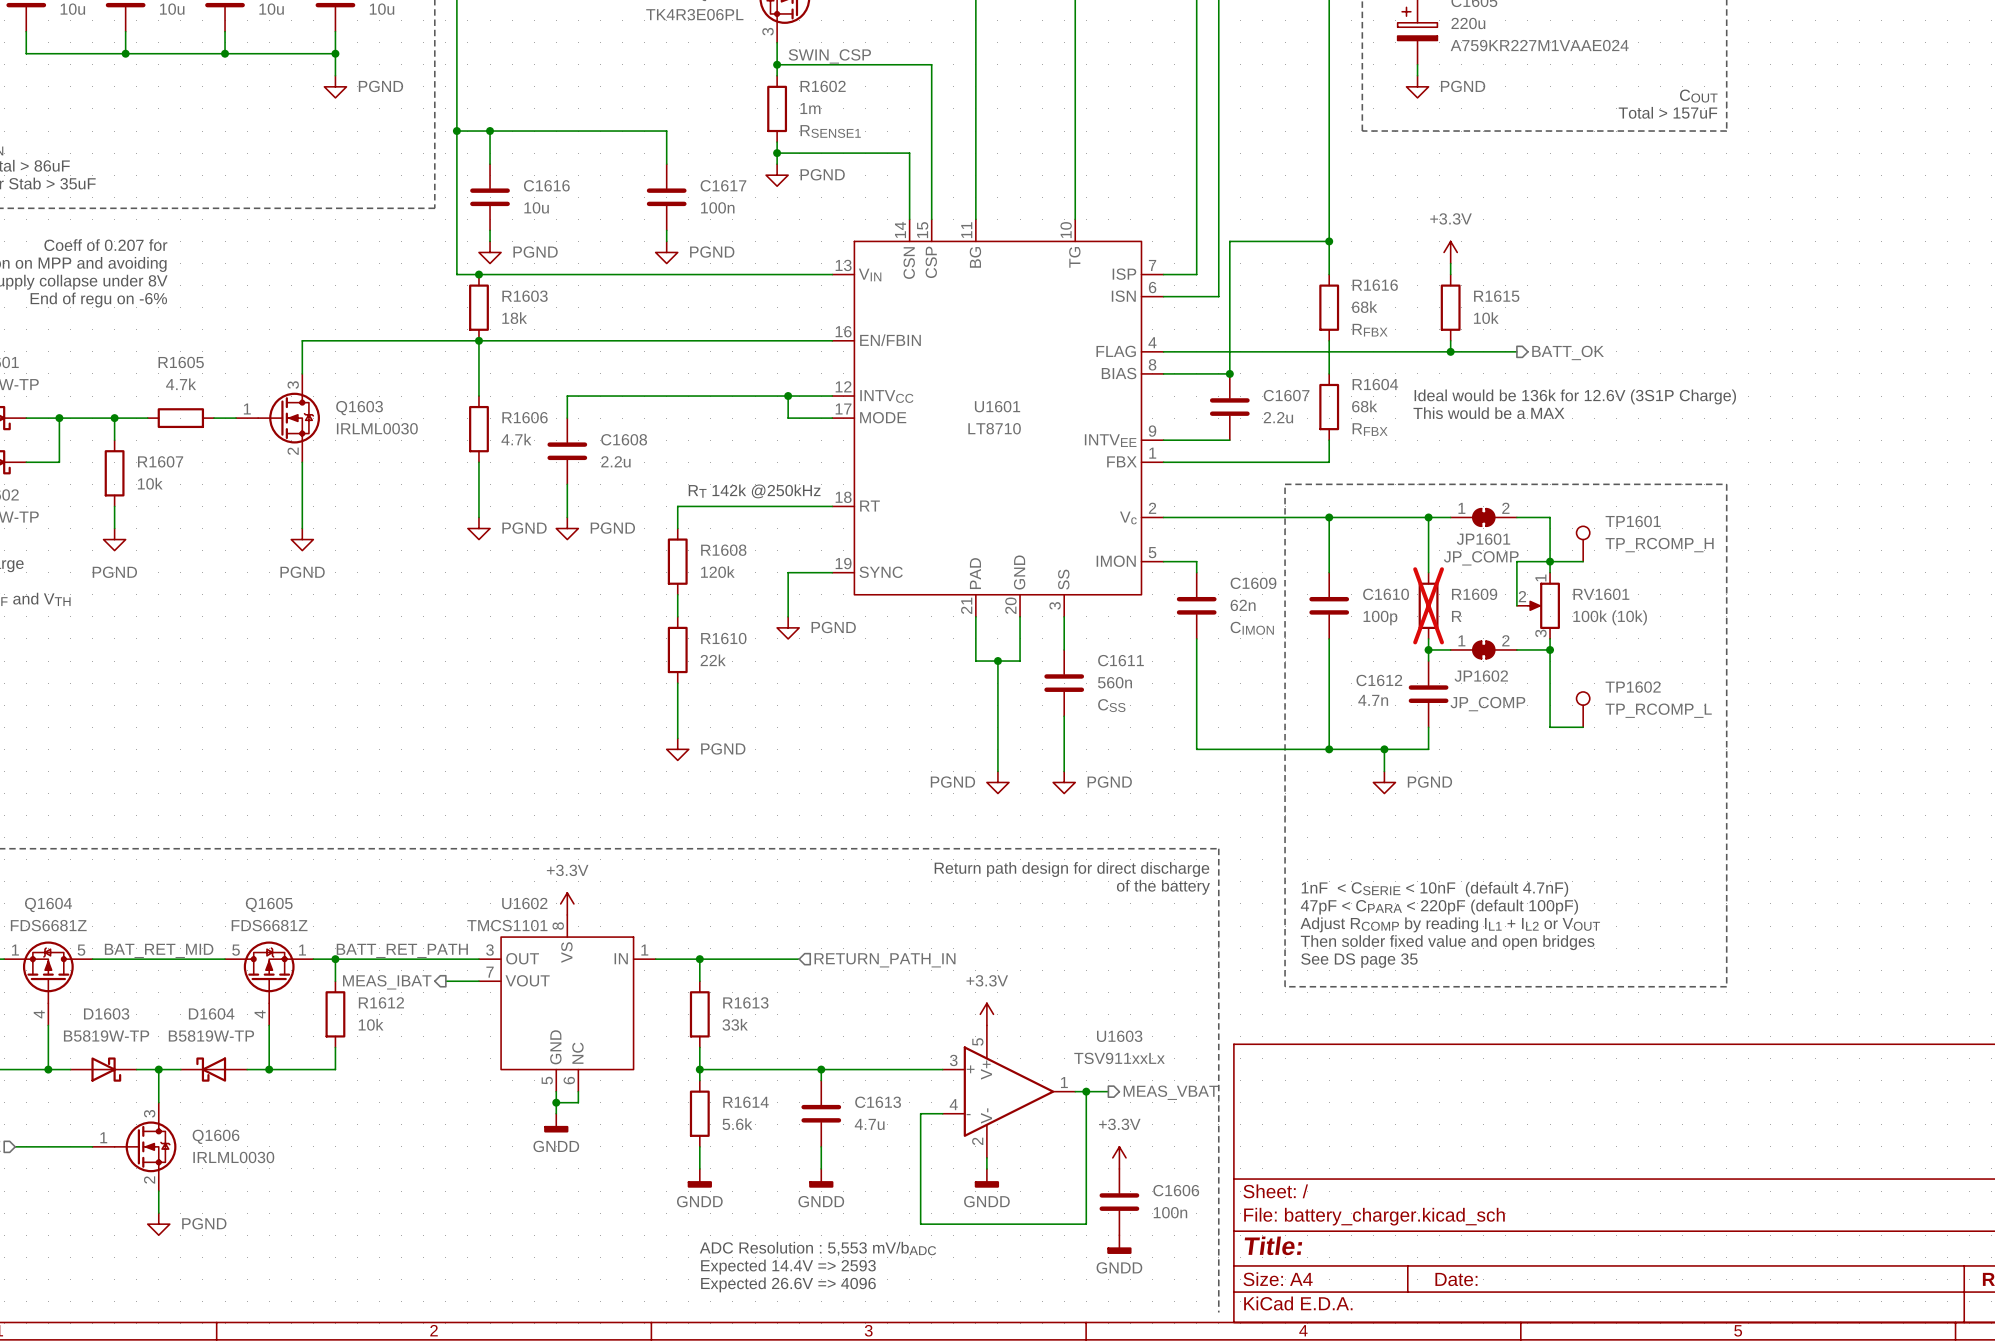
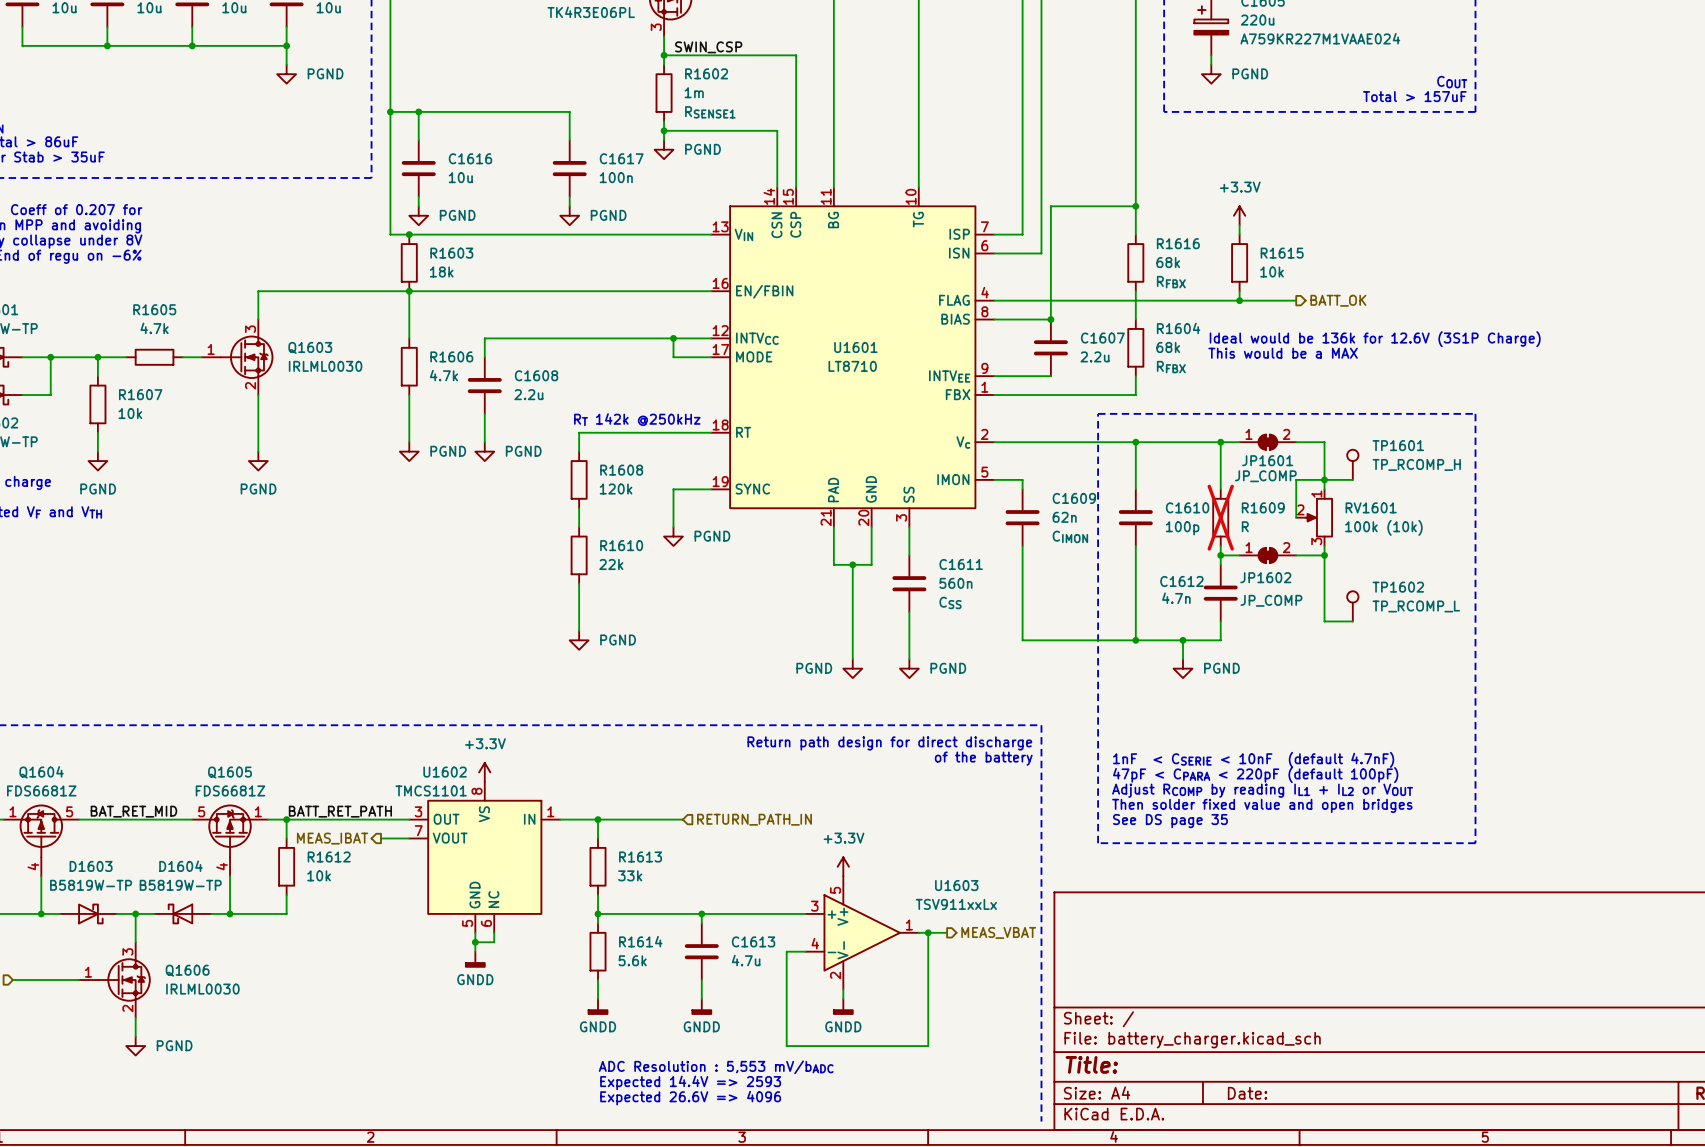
power symbol: +3.3V (1119, 1157) -> none
C1606: 100n (1119, 1202) -> none
power symbol: GNDD (1119, 1244) -> none

